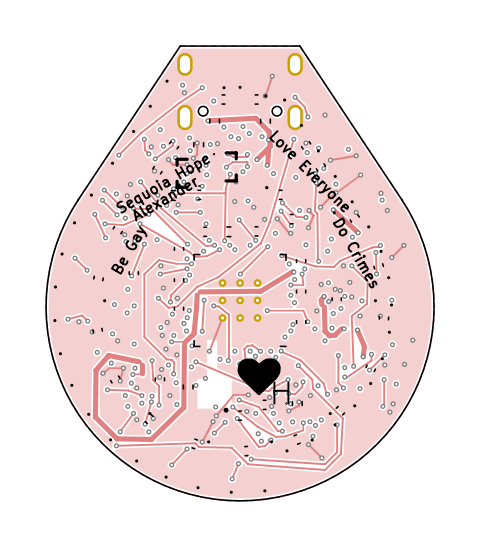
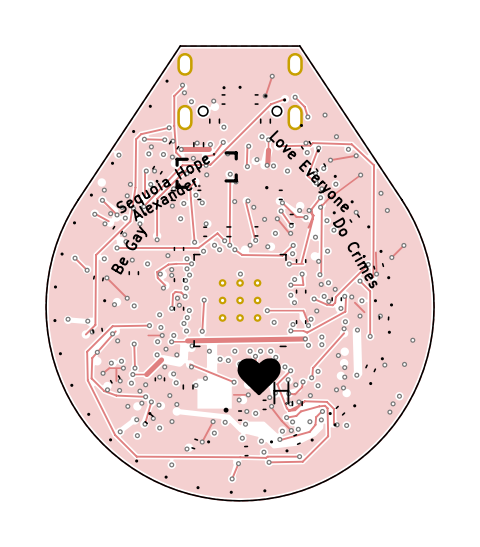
track: none -> (183, 87) (174, 95) (176, 152) (180, 157)
track: (202, 87) (141, 132) (118, 155) -> none
via: (202, 87) -> none
track: none -> (284, 99) (270, 104) (210, 164) (182, 165) (143, 206)
via: none -> (191, 101)
track: (207, 120) (255, 118) (269, 131) (270, 146) (256, 159) -> none
via: (207, 120) -> none
via: (242, 126) -> none
track: none -> (169, 127) (141, 134) (136, 139) (135, 187) (130, 221) (96, 255) (95, 324) (85, 334)
via: none -> (169, 127)
via: (160, 129) -> none
via: (249, 133) -> none
via: (230, 136) -> none
via: none -> (336, 136)
via: (189, 137) -> none
via: (238, 138) -> none
track: (144, 139) (145, 150) (148, 153) -> (144, 139) (164, 139)
via: none -> (164, 139)
track: (293, 139) (269, 222) (260, 243) (218, 277) (197, 286) (177, 306) (168, 307) (158, 298) -> none
via: (293, 139) -> none
track: (173, 141) (173, 145) (155, 158) -> none
track: none -> (223, 142) (213, 155) (206, 156)
via: none -> (223, 142)
track: (197, 143) (197, 154) (193, 158) -> none
via: (217, 143) -> none
via: (163, 146) -> none
via: none -> (248, 146)
track: none -> (277, 146) (310, 145) (312, 143) (351, 144) (374, 165) (373, 277)
track: none -> (247, 147) (246, 165)
track: none -> (181, 149) (209, 149)
via: none -> (181, 149)
via: (190, 150) -> none
track: (227, 153) (232, 157) (247, 157) (247, 154) -> none
via: none -> (163, 154)
via: (247, 154) -> none
via: none -> (172, 157)
via: (175, 157) -> none
via: (155, 158) -> none
track: (203, 158) (187, 173) -> none
via: (168, 159) -> none
track: (169, 160) (173, 164) (187, 164) -> none
via: (187, 164) -> none
via: none -> (273, 165)
track: (247, 166) (247, 162) (232, 162) (226, 167) -> none
via: (226, 167) -> none
track: none -> (185, 170) (157, 199) (157, 235)
via: none -> (146, 171)
via: (242, 171) -> none
via: none -> (287, 171)
track: none -> (145, 172) (145, 197)
via: (273, 173) -> none
track: (230, 174) (225, 188) (224, 240) -> (117, 248) (198, 248) (217, 233) (224, 240)
via: (295, 177) -> none
track: (140, 181) (161, 208) (206, 246) (214, 245) -> none
via: (140, 181) -> none
via: (183, 181) -> none
track: none -> (195, 181) (190, 186) (194, 242)
track: none -> (230, 181) (229, 245)
track: (316, 182) (314, 211) (317, 213) (318, 260) -> (316, 182) (307, 176) (317, 150)
via: none -> (150, 184)
via: (202, 186) -> none
via: none -> (321, 188)
track: (104, 190) (122, 207) -> none
via: (335, 192) -> none
via: (116, 193) -> none
track: (225, 193) (178, 193) (166, 205) -> none
via: (157, 195) -> none
via: none -> (195, 195)
track: none -> (320, 197) (311, 209) (312, 218) (301, 263)
via: none -> (320, 197)
via: (197, 199) -> none
via: (382, 200) -> none
via: none -> (202, 202)
track: none -> (246, 202) (255, 239)
via: none -> (183, 203)
via: (178, 204) -> none
track: none -> (321, 204) (321, 273)
via: (166, 205) -> none
via: none -> (143, 206)
via: none -> (172, 206)
track: (133, 208) (152, 209) (187, 244) -> none
track: (333, 209) (358, 232) -> none
via: (333, 209) -> none
track: (176, 212) (200, 212) -> none
via: (176, 212) -> none
via: (200, 212) -> none
track: none -> (94, 213) (108, 221)
via: none -> (110, 213)
track: (94, 214) (105, 237) -> none
track: (148, 214) (123, 225) (104, 223) -> none
via: (148, 214) -> none
via: none -> (180, 218)
track: (239, 220) (255, 240) -> none
via: (239, 220) -> none
via: none -> (326, 220)
track: (139, 223) (190, 252) (194, 256) (206, 256) (219, 249) -> none
via: (308, 227) -> none
via: none -> (333, 230)
via: (358, 232) -> none
via: (105, 237) -> none
via: none -> (315, 237)
via: (352, 237) -> none
via: (331, 239) -> none
via: (209, 240) -> none
via: (134, 241) -> none
via: none -> (194, 242)
track: (144, 244) (131, 275) -> none
via: (144, 244) -> none
via: (187, 244) -> none
via: (305, 244) -> none
track: none -> (293, 245) (282, 255) (242, 255) (234, 249)
via: none -> (293, 245)
track: (380, 245) (340, 260) (333, 267) (315, 266) (281, 255) -> none
via: (380, 245) -> none
track: (267, 246) (240, 274) -> none
via: none -> (117, 248)
via: (375, 252) -> none
via: none -> (292, 253)
via: none -> (167, 255)
via: (281, 255) -> none
via: none -> (104, 258)
via: none -> (132, 260)
via: none -> (147, 263)
track: (176, 263) (159, 260) (144, 274) (144, 337) (166, 359) (174, 362) (173, 373) -> (176, 263) (168, 264) (157, 272) (157, 277) (165, 285)
track: none -> (289, 263) (303, 263)
track: none -> (368, 264) (335, 296) (332, 305) (314, 298)
via: none -> (368, 264)
via: (160, 265) -> none
via: (343, 265) -> none
track: (351, 265) (367, 281) (367, 303) (351, 316) (353, 366) -> none
via: (351, 265) -> none
track: (187, 268) (160, 274) -> none
via: none -> (171, 269)
via: (304, 269) -> none
track: (293, 271) (260, 291) (200, 291) -> none
via: (293, 272) -> none
via: none -> (319, 274)
via: (131, 275) -> none
via: none -> (171, 275)
track: none -> (106, 277) (127, 298)
via: none -> (106, 277)
track: (185, 280) (171, 295) (170, 302) -> none
track: none -> (360, 281) (370, 291) (370, 336)
via: none -> (360, 281)
via: (349, 282) -> none
via: none -> (186, 288)
via: (127, 289) -> none
via: (340, 290) -> none
track: (197, 295) (193, 333) (185, 341) -> none
track: none -> (185, 296) (181, 292) (175, 291) (173, 294) (172, 307)
via: none -> (185, 296)
track: (324, 296) (321, 300) (321, 304) -> none
track: none -> (346, 297) (345, 311) (307, 332) (290, 330)
via: none -> (127, 298)
via: (158, 298) -> none
via: none -> (314, 298)
via: (391, 300) -> none
via: (170, 302) -> none
track: none -> (354, 302) (364, 312)
via: none -> (179, 305)
track: (213, 305) (218, 306) (228, 314) (228, 359) -> none
via: (213, 305) -> none
track: (324, 307) (325, 331) (329, 335) (335, 335) (341, 328) -> none
via: none -> (171, 308)
via: (127, 312) -> none
via: (333, 313) -> none
via: none -> (159, 314)
via: (172, 314) -> none
track: (222, 317) (209, 351) -> none
track: (68, 319) (82, 315) (87, 321) -> none
via: none -> (311, 319)
via: (78, 321) -> none
via: (307, 321) -> none
via: none -> (345, 321)
via: (167, 322) -> none
via: none -> (274, 322)
track: none -> (149, 325) (112, 326) (87, 351) (87, 380) (115, 435) (136, 456) (299, 456)
via: none -> (149, 325)
via: none -> (308, 325)
via: (314, 328) -> none
via: (332, 328) -> none
track: (357, 330) (364, 346) (363, 356) -> none
track: none -> (115, 331) (92, 358) (91, 378) (104, 391) (116, 395) (145, 396)
track: none -> (344, 333) (312, 368) (312, 377)
track: none -> (148, 335) (162, 335)
via: none -> (370, 336)
via: (284, 337) -> none
via: none -> (321, 337)
track: none -> (305, 338) (187, 340)
via: none -> (305, 338)
via: (325, 340) -> none
via: none -> (157, 341)
track: none -> (134, 344) (134, 368)
track: (184, 344) (183, 407) (151, 439) (117, 438) (95, 417) (96, 370) (108, 355) (139, 361) -> none
via: none -> (321, 344)
via: (392, 344) -> none
via: none -> (308, 345)
track: (260, 351) (252, 345) (247, 345) (244, 349) (247, 376) -> none
track: (281, 351) (300, 359) (323, 383) (327, 394) -> none
via: (281, 351) -> none
via: none -> (157, 354)
track: (371, 354) (371, 360) (344, 377) -> none
via: (371, 354) -> none
track: (384, 354) (369, 370) -> none
via: (384, 354) -> none
track: (338, 355) (338, 382) (343, 387) -> none
via: (363, 356) -> none
track: (152, 360) (153, 380) (159, 386) (159, 405) -> none
via: (152, 360) -> none
via: none -> (121, 361)
track: (195, 361) (263, 390) (269, 391) (288, 379) -> none
via: (195, 361) -> none
track: none -> (190, 364) (234, 382)
track: (142, 365) (142, 373) (132, 374) -> (161, 359) (146, 374) (132, 374)
via: (168, 365) -> none
track: (298, 365) (312, 379) (312, 388) (342, 418) (340, 454) (325, 469) (248, 464) (231, 447) (199, 447) (195, 443) (116, 445) -> none
via: (298, 365) -> none
via: none -> (164, 366)
via: none -> (284, 366)
via: (353, 366) -> none
track: none -> (116, 368) (116, 380)
track: (123, 368) (120, 380) -> none
via: (161, 369) -> none
track: none -> (290, 370) (277, 384) (286, 408) (289, 410) (295, 410) (304, 401) (326, 401) (333, 408) (333, 423)
via: none -> (290, 370)
via: (369, 370) -> none
via: none -> (318, 371)
via: none -> (356, 375)
via: none -> (311, 377)
track: (384, 379) (382, 406) -> none
via: (384, 379) -> none
via: none -> (234, 382)
via: none -> (145, 384)
via: (396, 384) -> none
via: (136, 387) -> none
via: (360, 388) -> none
track: (107, 389) (128, 390) (141, 395) -> none
via: none -> (119, 390)
via: none -> (139, 391)
track: (233, 394) (216, 415) -> none
via: (327, 394) -> none
via: (125, 395) -> none
via: (141, 395) -> none
via: none -> (145, 396)
via: (152, 396) -> none
via: none -> (399, 396)
track: (239, 400) (258, 407) (277, 431) (282, 431) -> none
via: (382, 406) -> none
via: (215, 407) -> none
track: (232, 407) (257, 426) (276, 436) (285, 436) (303, 430) (303, 422) -> none
via: (232, 407) -> none
track: none -> (270, 407) (291, 430)
via: (288, 410) -> none
track: none -> (321, 411) (316, 417) (315, 424) (309, 431) (280, 440)
via: none -> (322, 411)
track: (133, 413) (120, 431) -> none
via: (133, 413) -> none
via: (273, 413) -> none
via: (216, 415) -> none
track: none -> (286, 417) (296, 415) (300, 411) (325, 405) (327, 408) (328, 436) (302, 461) (269, 462)
via: none -> (286, 417)
track: (237, 418) (258, 447) (265, 445) (270, 440) (268, 440) -> none
via: (237, 418) -> none
via: none -> (172, 421)
track: (225, 422) (214, 433) -> none
via: (279, 422) -> none
via: (303, 422) -> none
via: none -> (245, 424)
track: (337, 424) (337, 452) (325, 464) (251, 459) -> none
via: (315, 425) -> none
via: none -> (346, 425)
via: none -> (159, 428)
via: none -> (298, 429)
via: none -> (291, 430)
via: (148, 431) -> none
via: (258, 433) -> none
via: none -> (137, 435)
via: (312, 436) -> none
via: none -> (242, 438)
via: none -> (279, 439)
via: (270, 440) -> none
track: (308, 444) (321, 457) -> none
via: (308, 444) -> none
via: (116, 445) -> none
track: (187, 449) (171, 464) -> none
via: none -> (263, 452)
via: none -> (299, 456)
via: (321, 457) -> none
via: (251, 459) -> none
via: none -> (269, 462)

